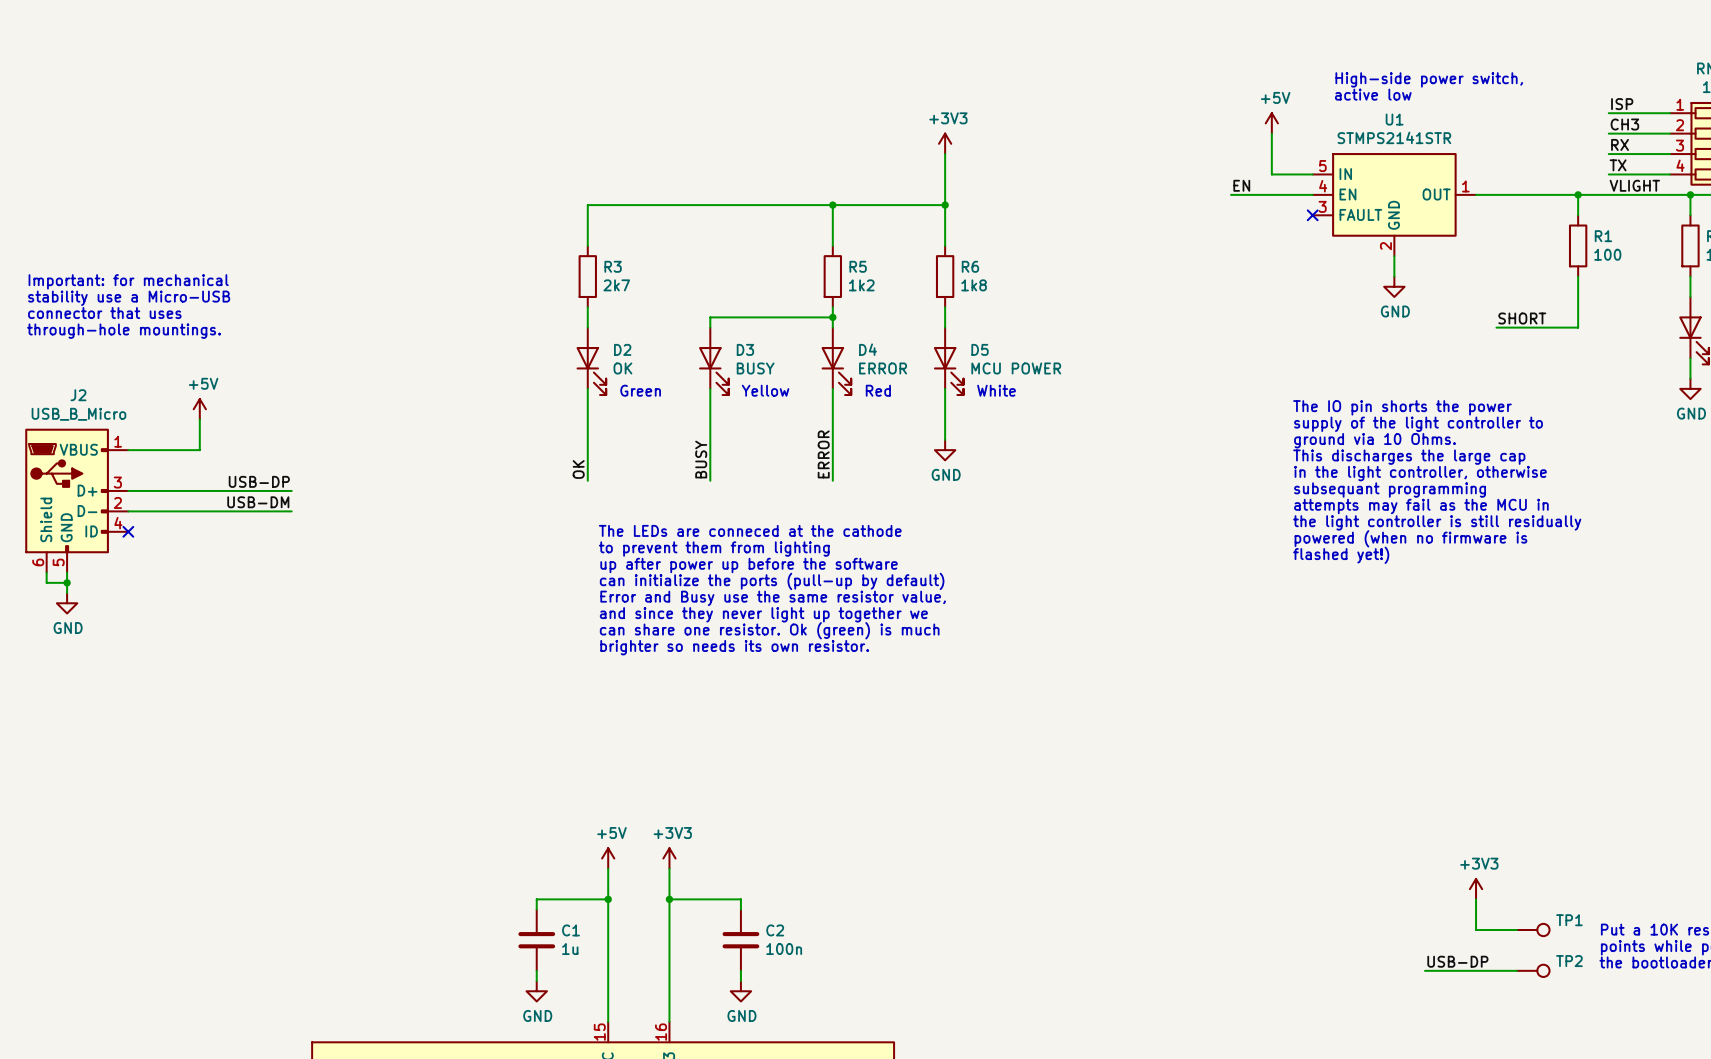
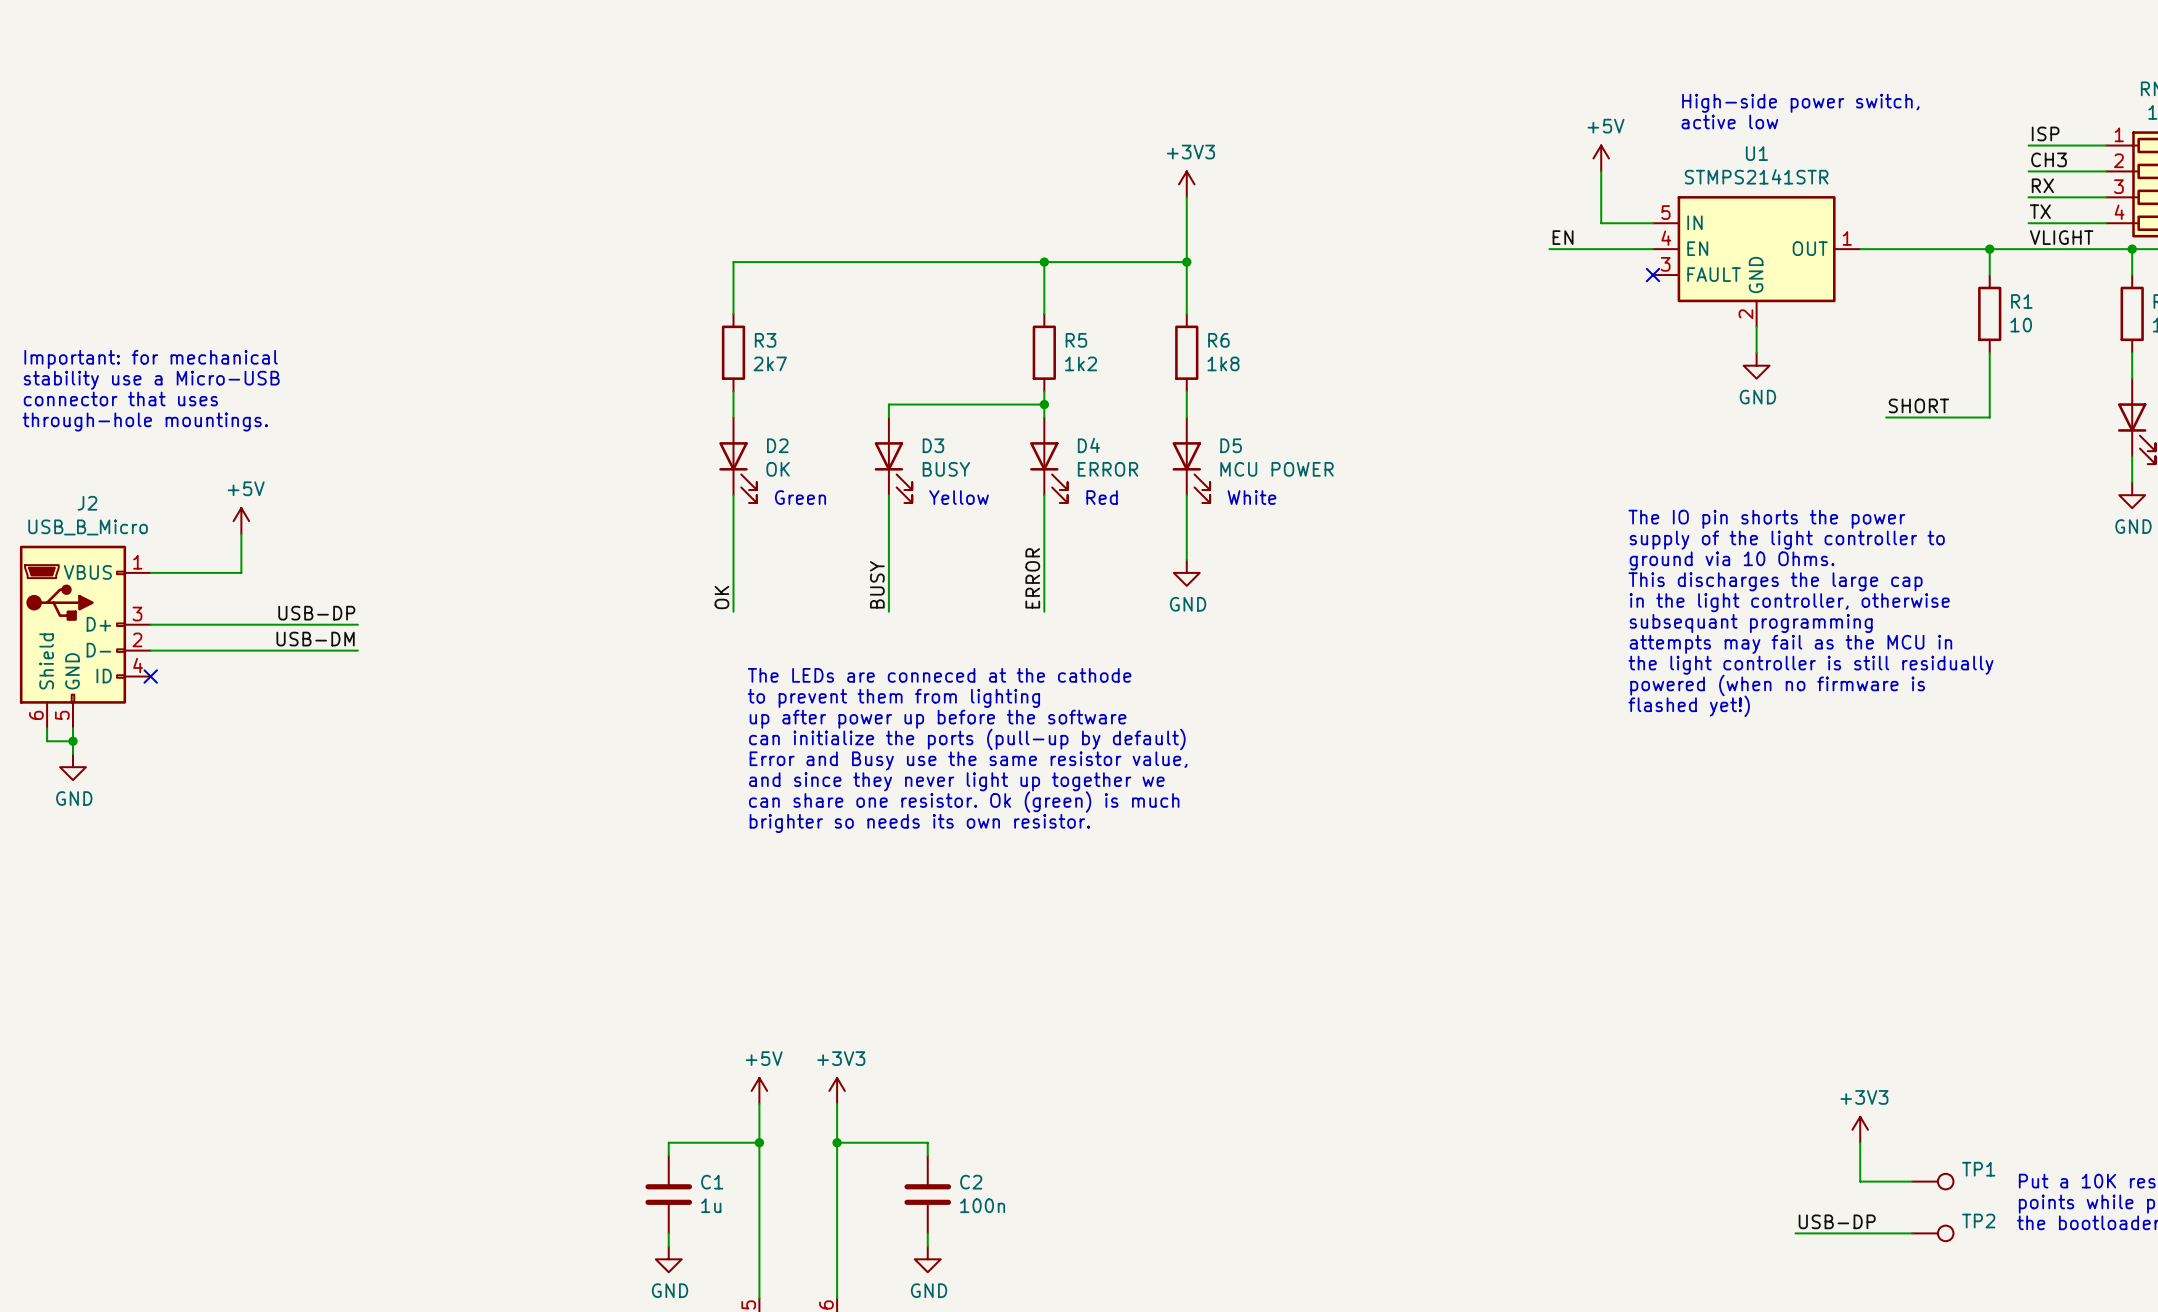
R1 value: 100 (1607, 254) -> 10 (2021, 325)

